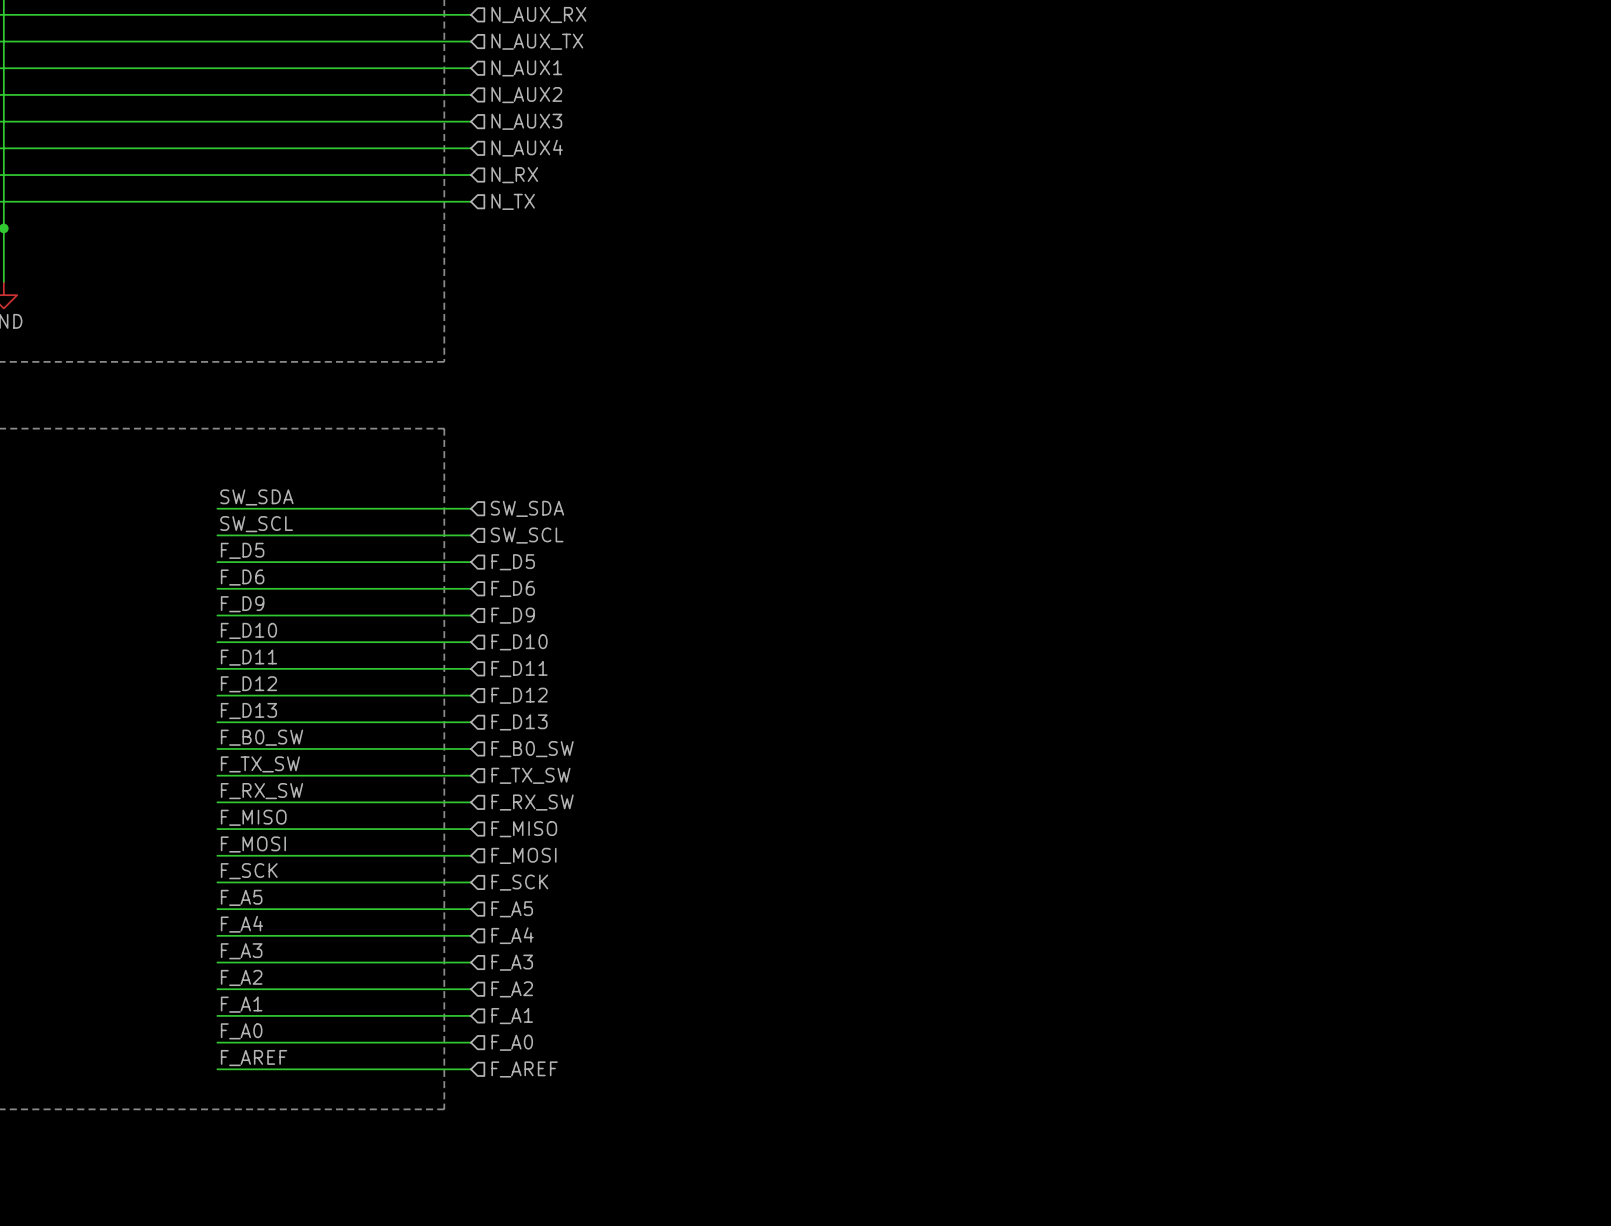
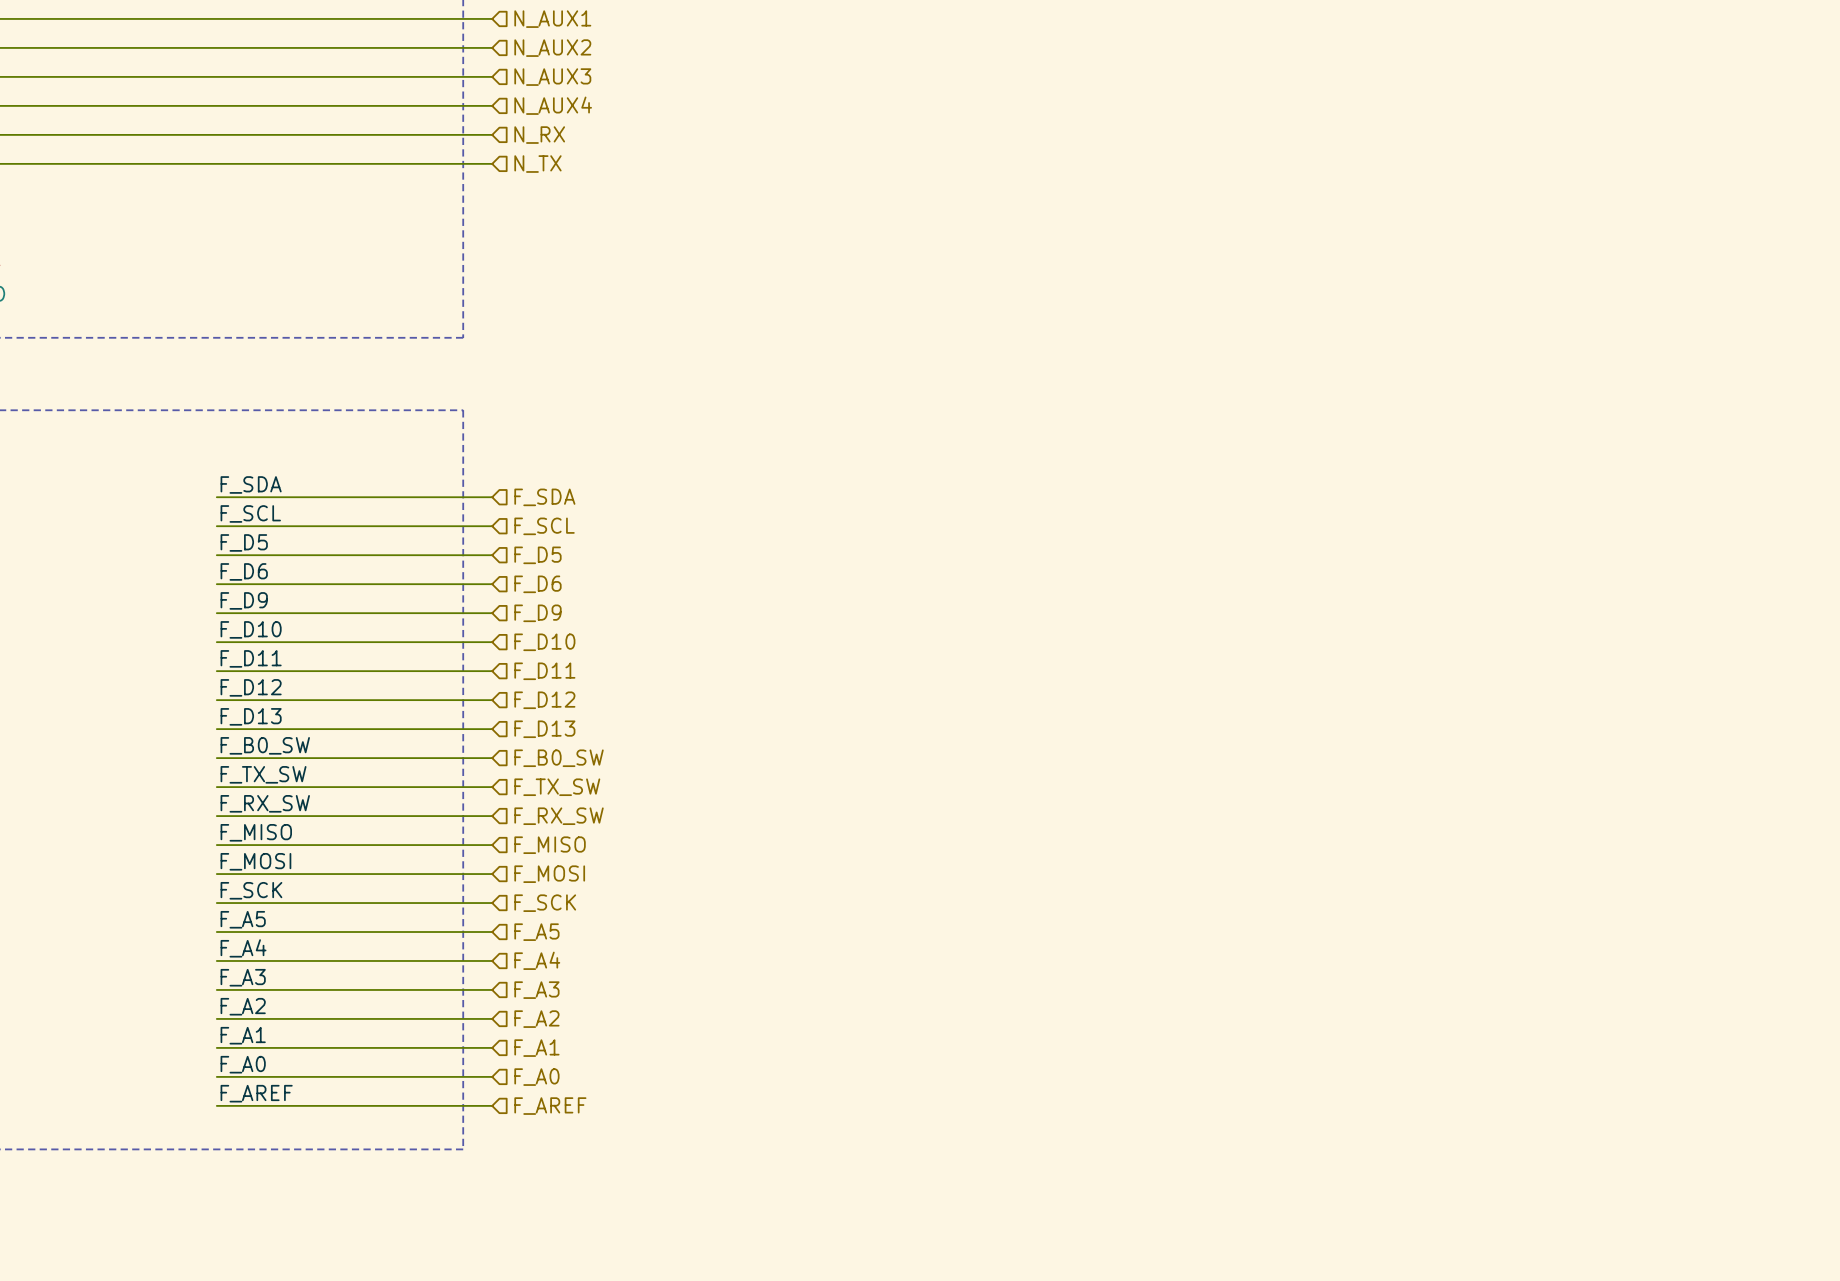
label: SW_SDA (256, 497) -> F_SDA (251, 484)
hierarchical label: SW_SDA (527, 508) -> F_SDA (544, 497)
label: SW_SCL (256, 524) -> F_SCL (250, 513)
hierarchical label: SW_SCL (527, 535) -> F_SCL (544, 526)

